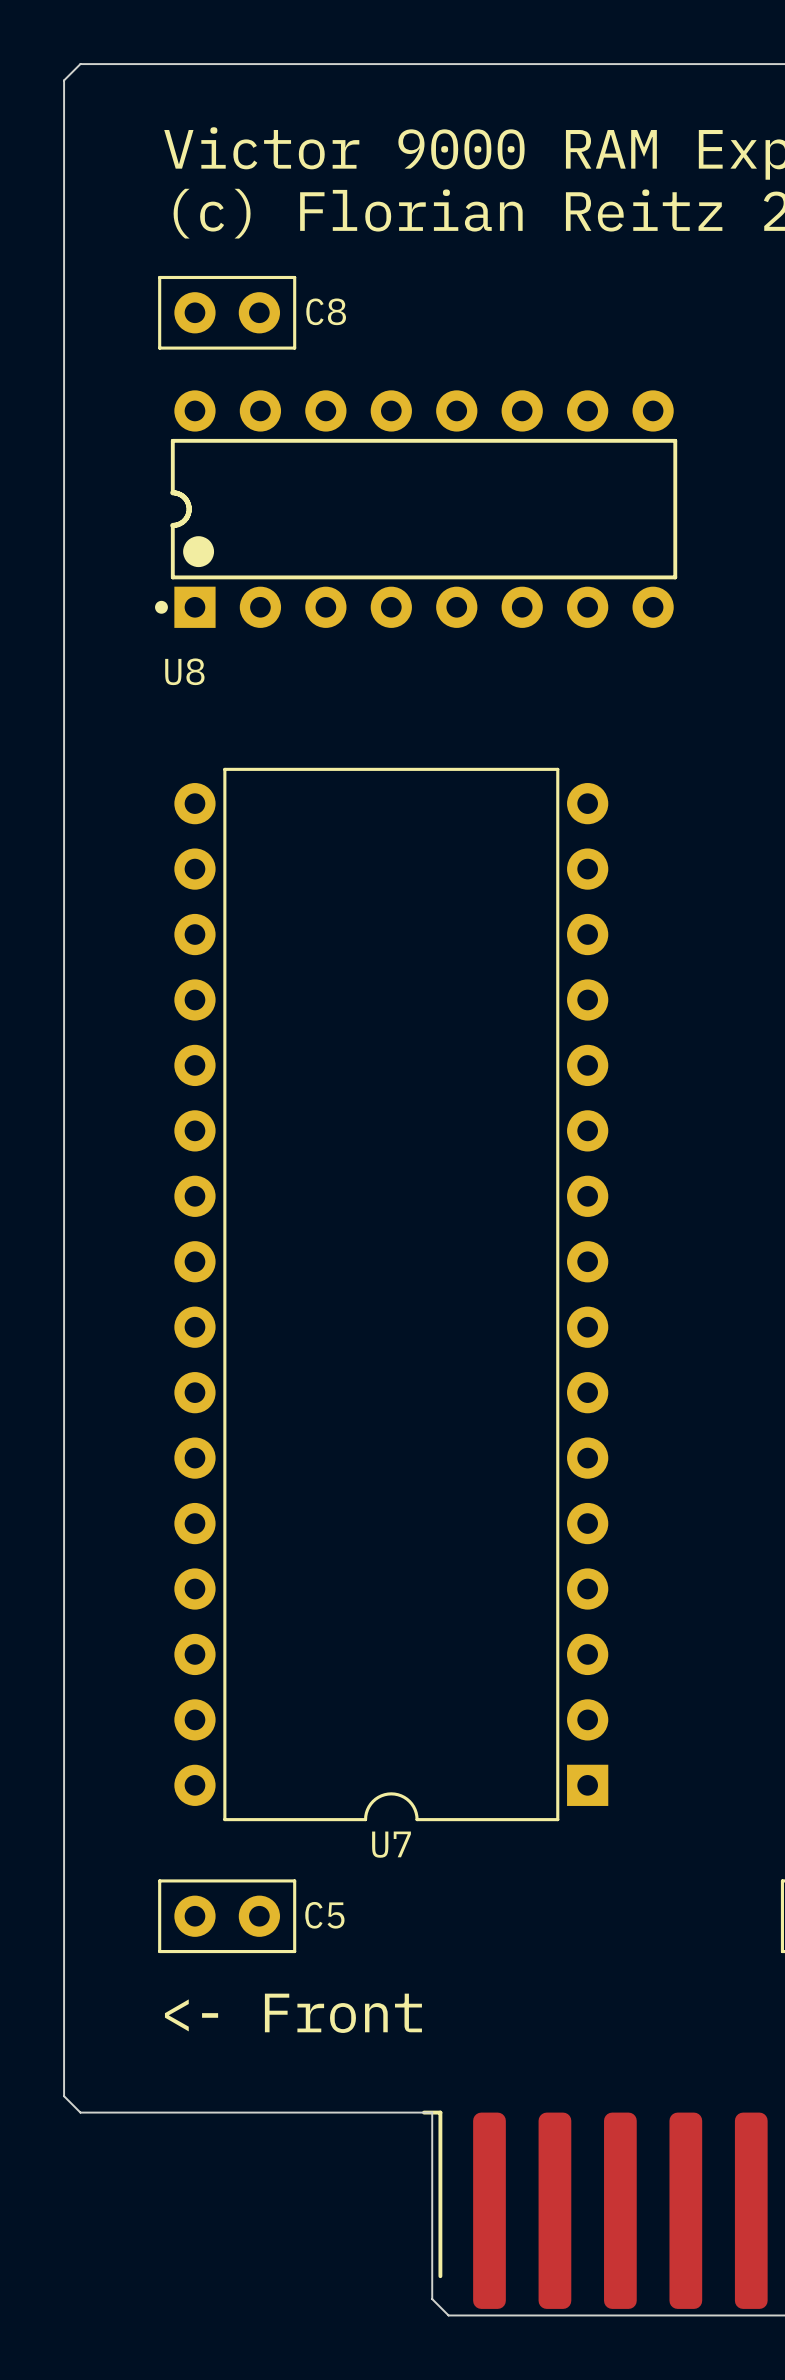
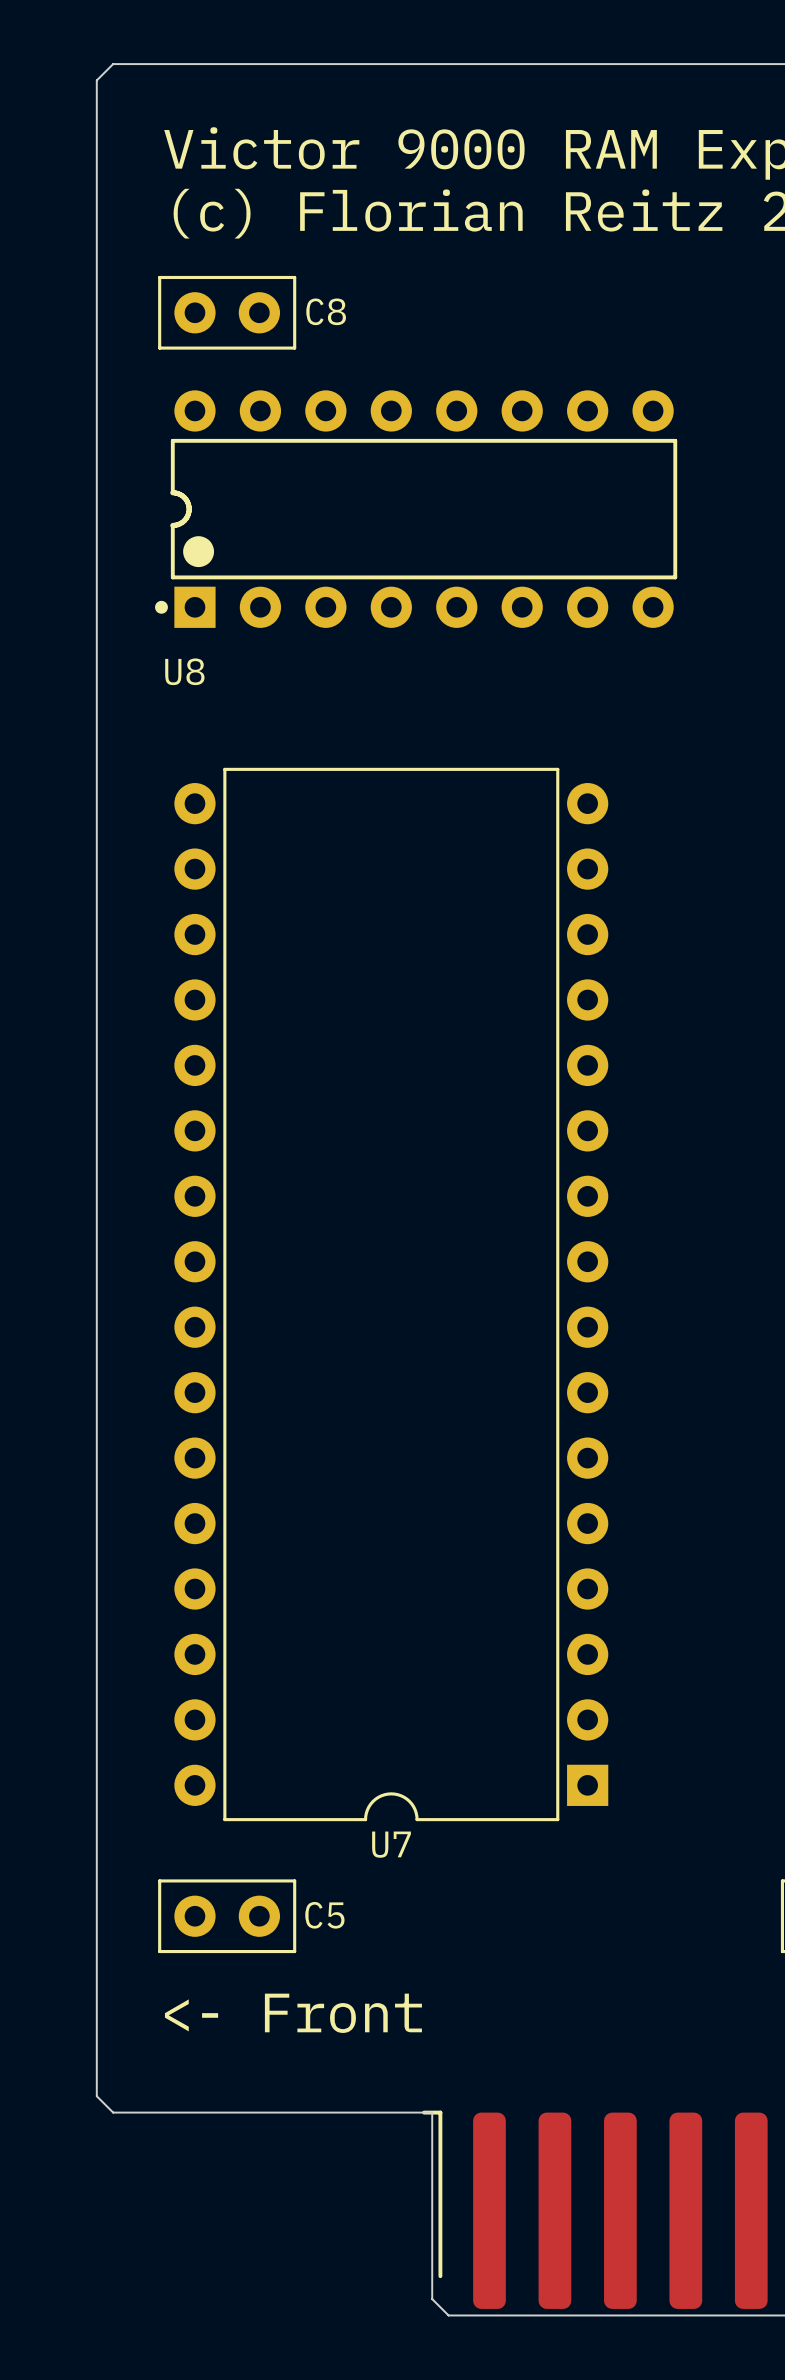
board edge: (113, 64) (80, 64) (64, 80) (64, 2096) (80, 2112) (113, 2112) -> (113, 64) (96, 80) (96, 2096) (113, 2112)

